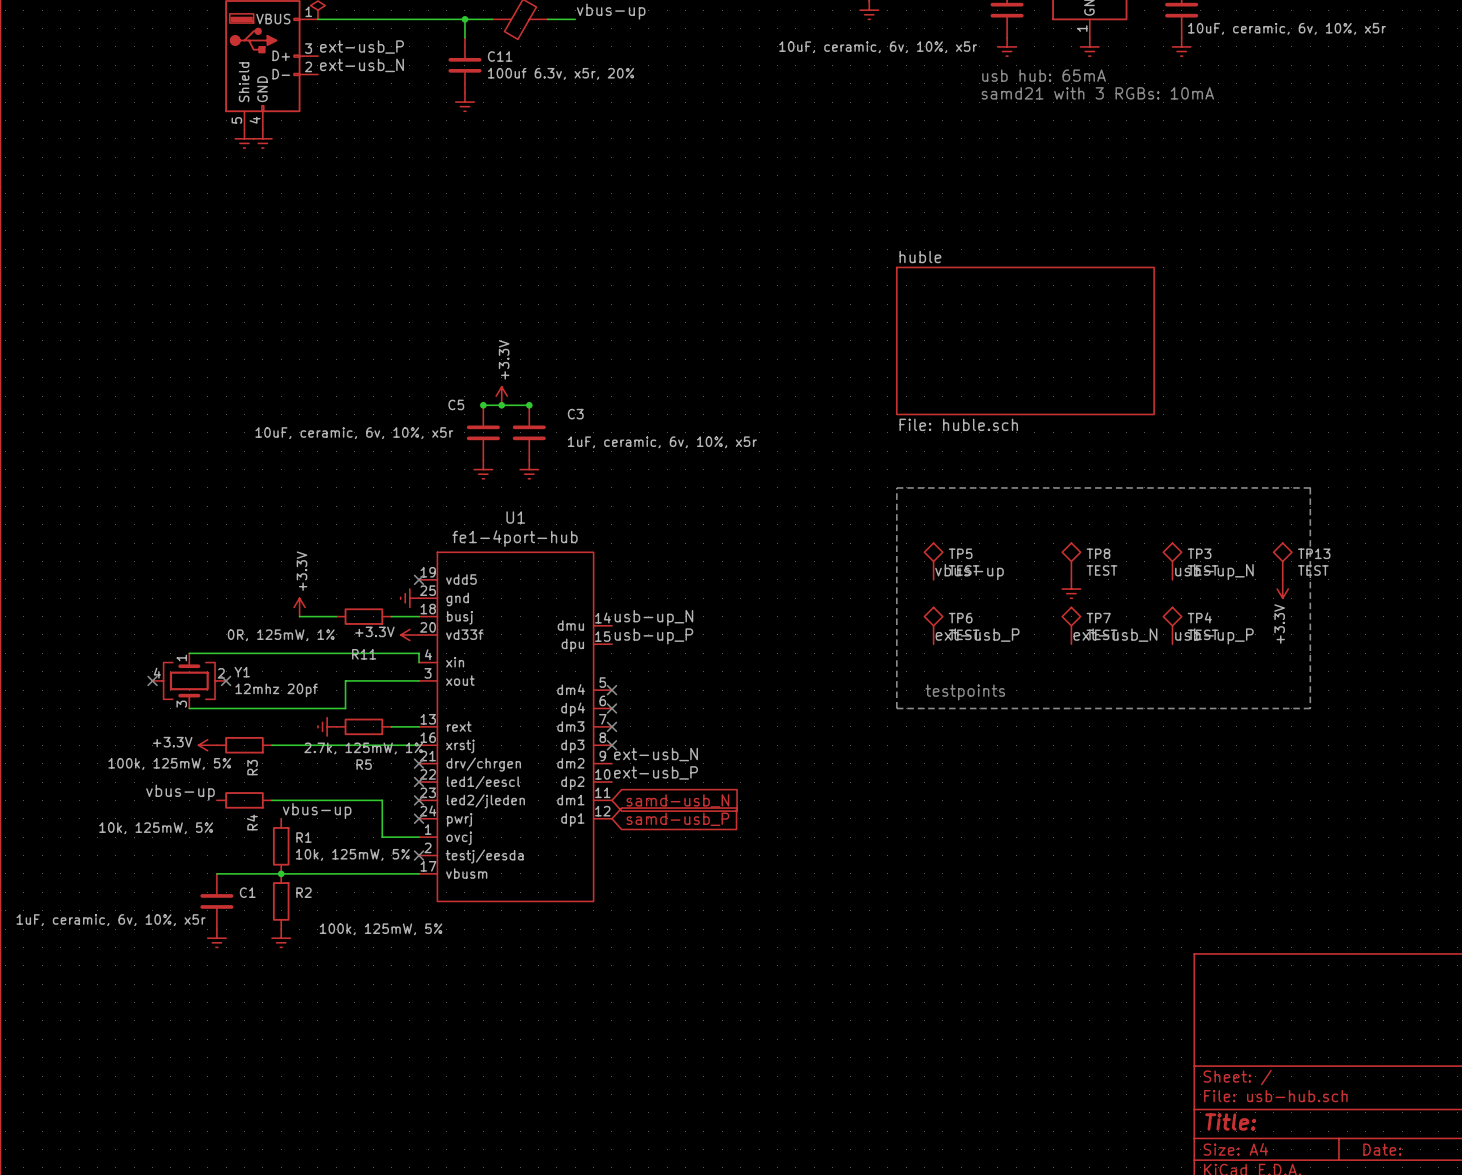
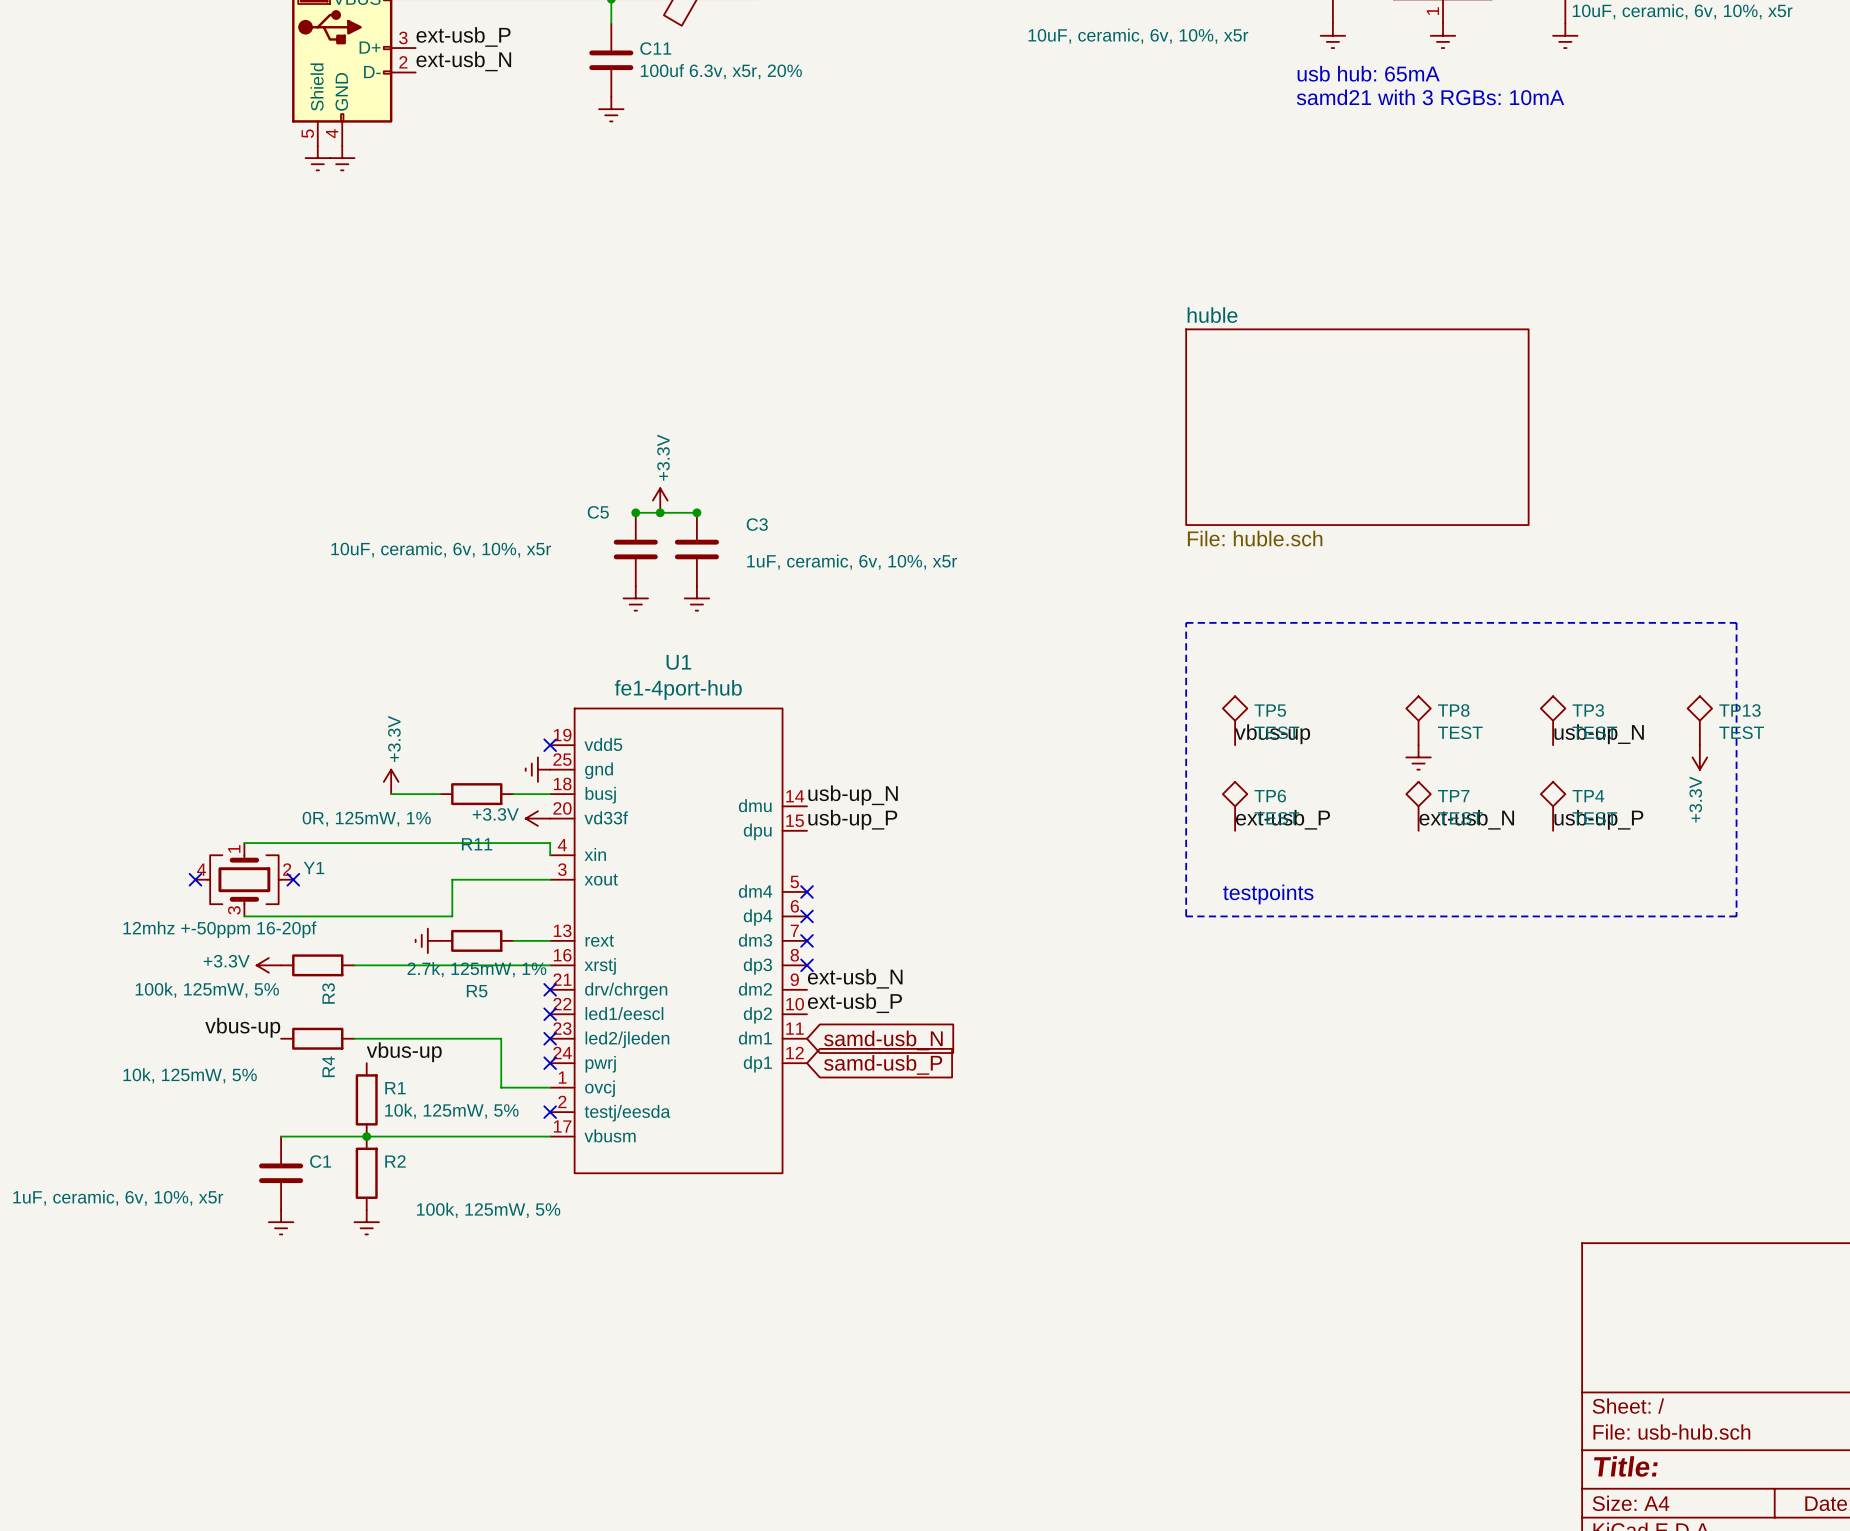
Y1 value: 12mhz 20pf (276, 690) -> 12mhz +-50ppm 16-20pf (219, 929)

